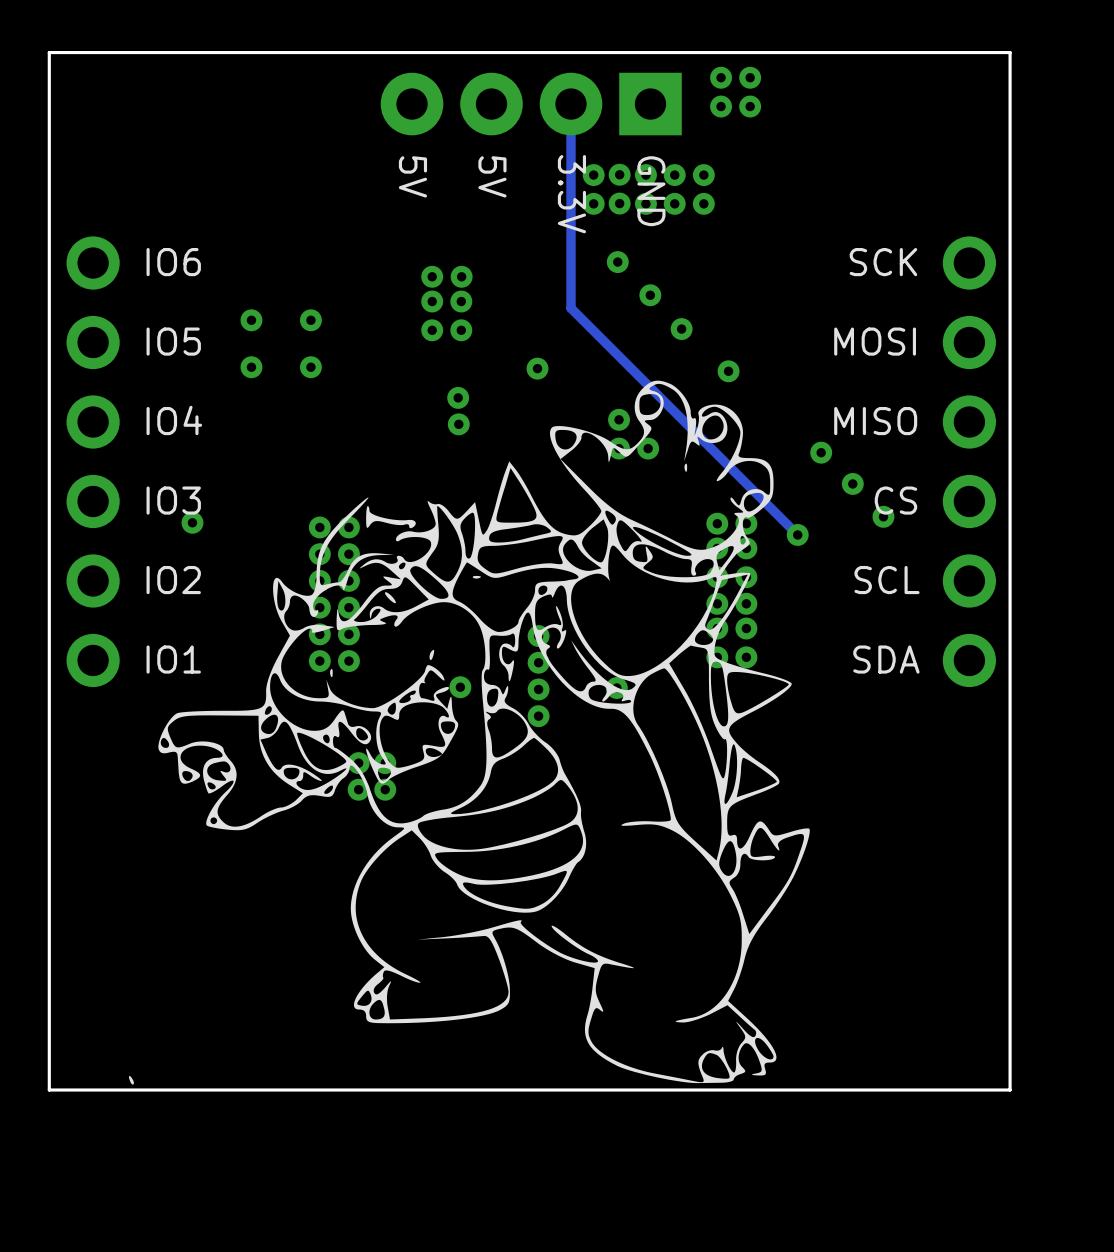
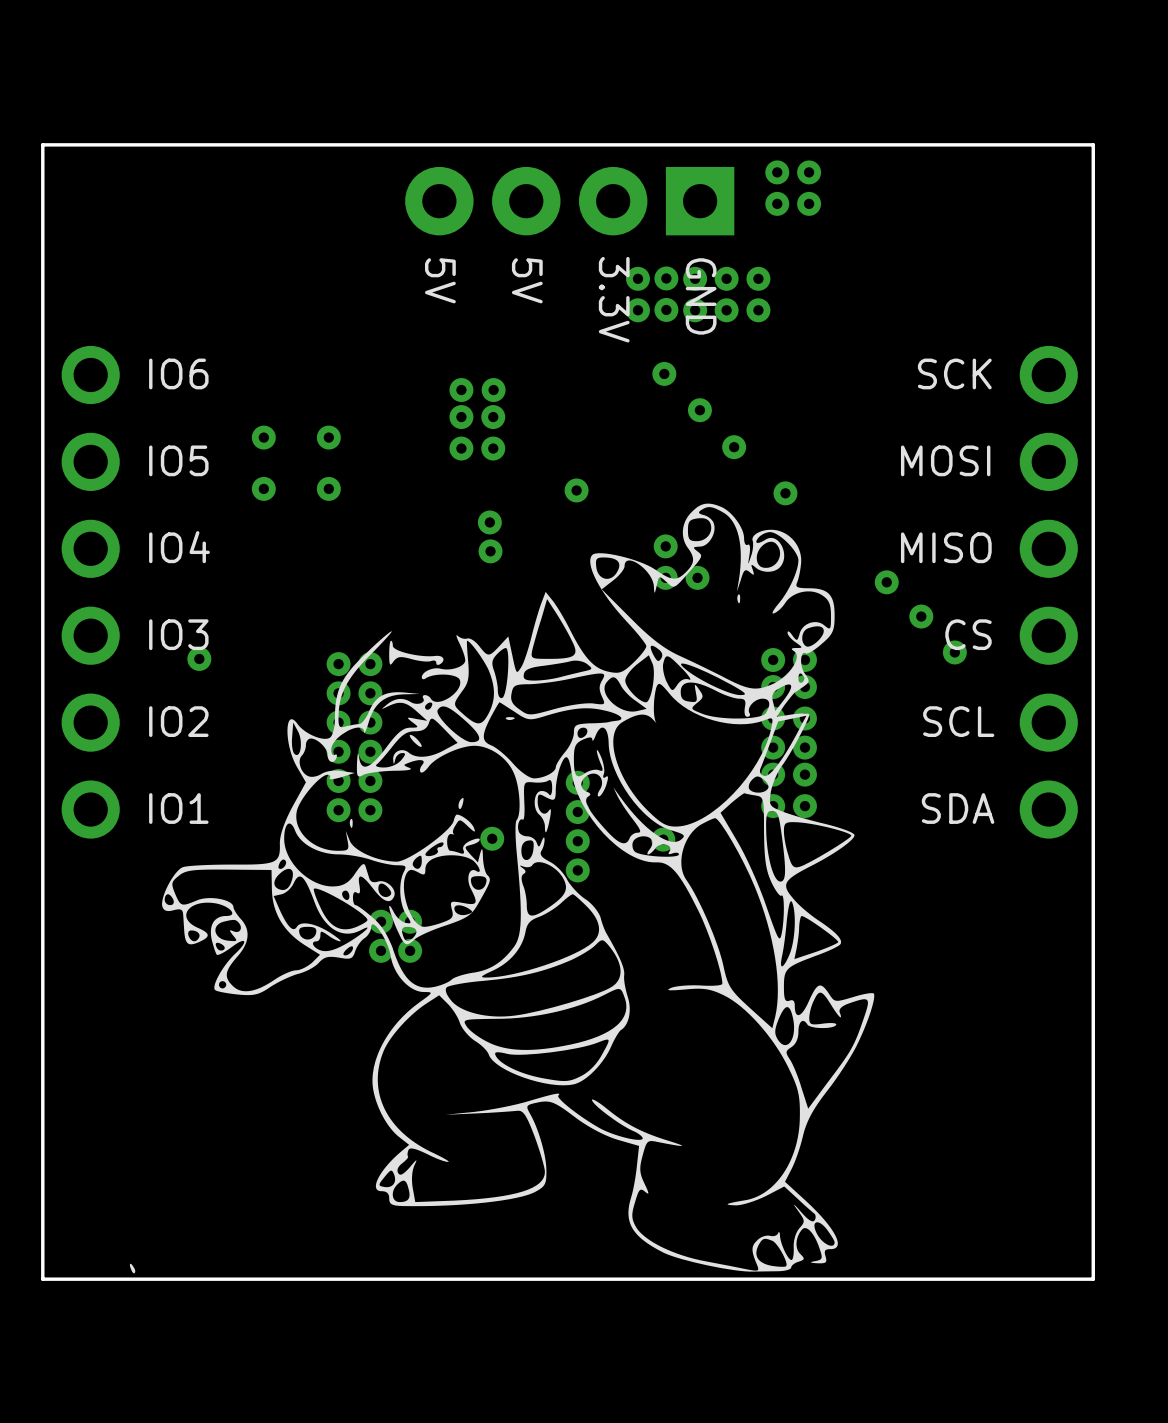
track: (571, 104) (571, 308) (797, 534) -> none
via: (797, 534) -> none

